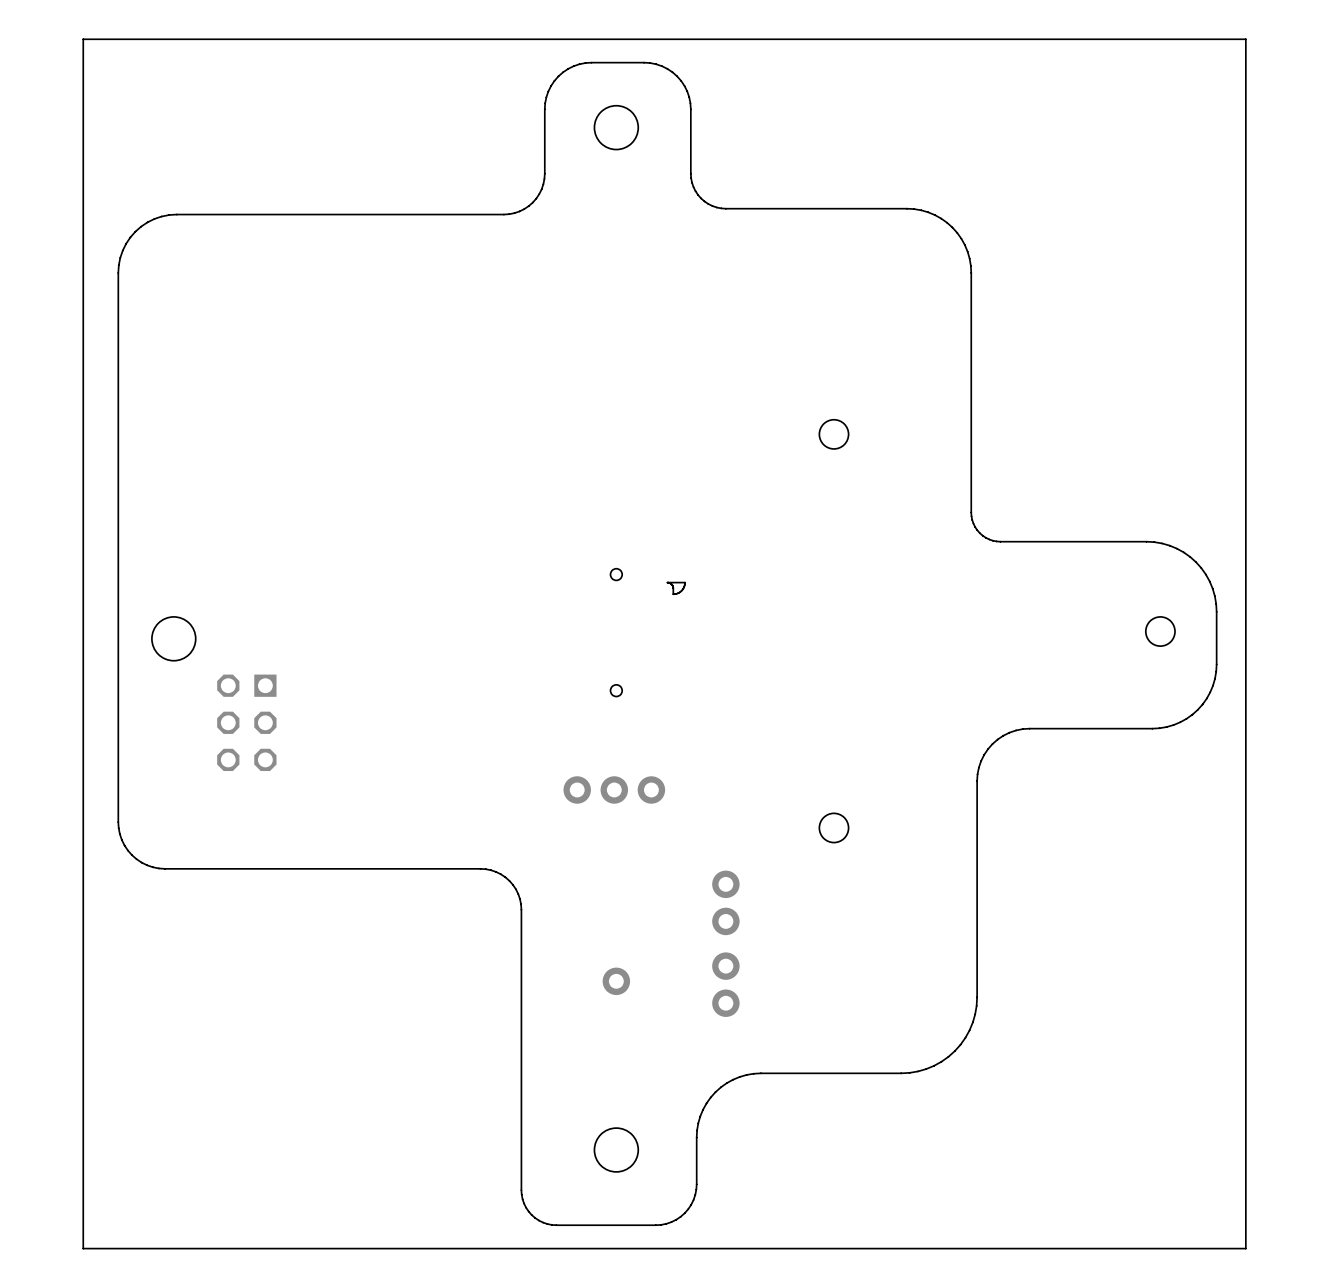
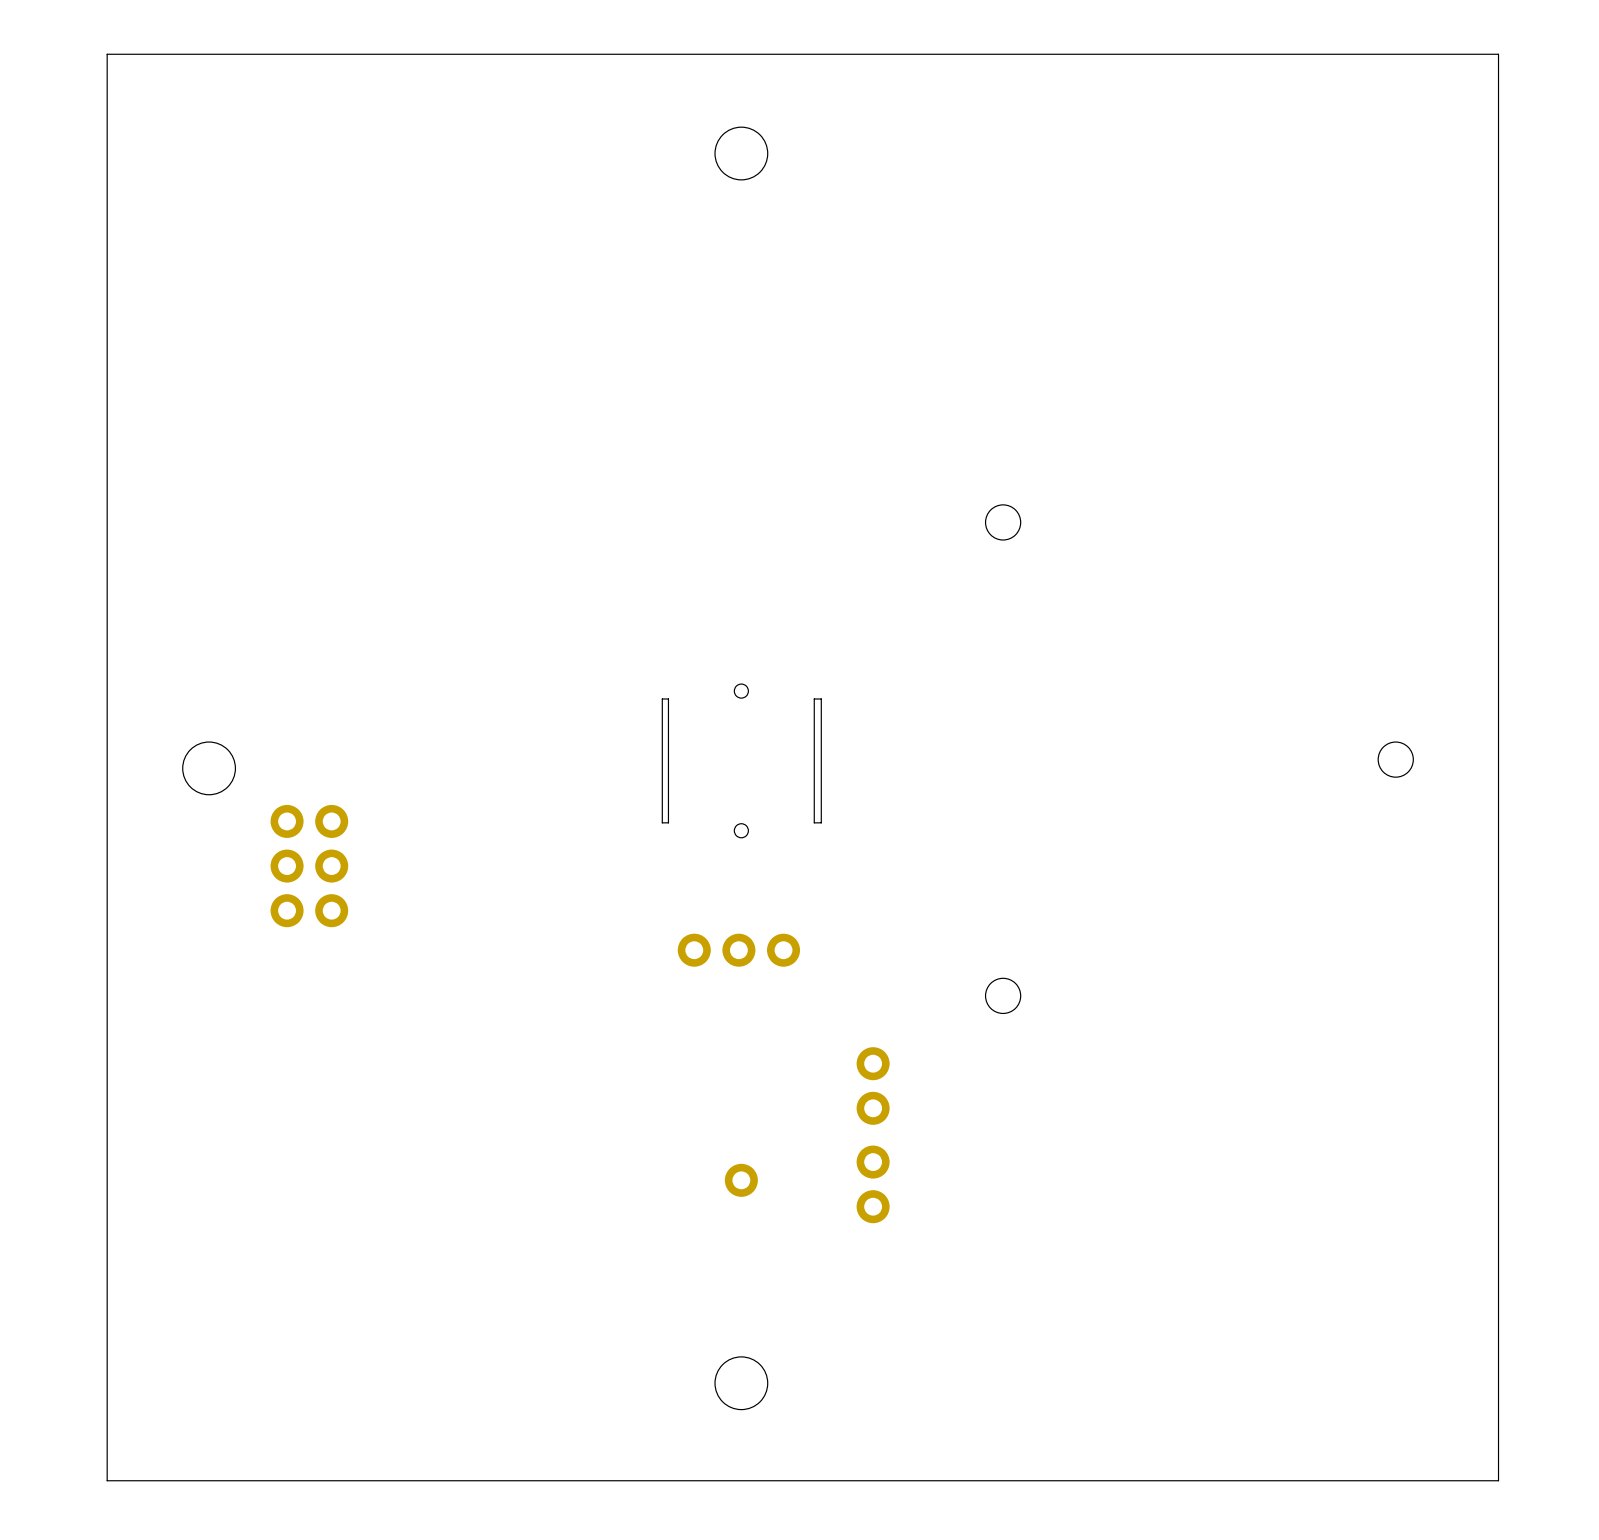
board edge: (1245, 45) (1245, 39) (83, 39) (83, 1248) (1245, 1248) (1245, 1231) -> (1498, 54) (107, 54) (107, 1480) (1498, 1480)
board edge: (644, 62) (656, 64) (667, 68) (681, 80) (687, 91) (690, 109) (691, 178) (695, 191) (708, 204) (725, 208) (914, 209) (934, 215) (952, 227) (964, 245) (970, 265) (971, 512) (975, 527) (985, 537) (996, 541) (1154, 542) (1169, 545) (1183, 552) (1196, 562) (1205, 574) (1214, 596) (1216, 671) (1210, 692) (1202, 704) (1192, 714) (1173, 725) (1152, 728) (1022, 729) (1003, 735) (987, 749) (981, 761) (977, 781) (976, 1005) (972, 1022) (965, 1037) (948, 1056) (926, 1069) (909, 1072) (760, 1073) (746, 1074) (733, 1079) (720, 1087) (710, 1097) (700, 1116) (696, 1137) (696, 1189) (691, 1204) (680, 1216) (671, 1222) (655, 1225) (551, 1224) (538, 1220) (531, 1214) (526, 1207) (521, 1194) (521, 909) (518, 894) (509, 880) (496, 871) (480, 868) (158, 868) (147, 865) (136, 859) (127, 850) (121, 840) (118, 822) (118, 265) (126, 243) (135, 231) (147, 222) (169, 215) (503, 214) (519, 211) (532, 202) (543, 184) (545, 103) (548, 91) (554, 80) (568, 68) (579, 64) (644, 62) -> none
board edge: none -> (668, 698) (662, 698) (662, 822) (668, 822) (668, 698)
board edge: none -> (821, 698) (814, 698) (814, 822) (821, 822) (821, 698)
board edge: (685, 582) (681, 590) (673, 594) (672, 585) (667, 582) (685, 582) -> none
part footprint: [217, 674, 277, 772] -> [270, 804, 349, 928]

